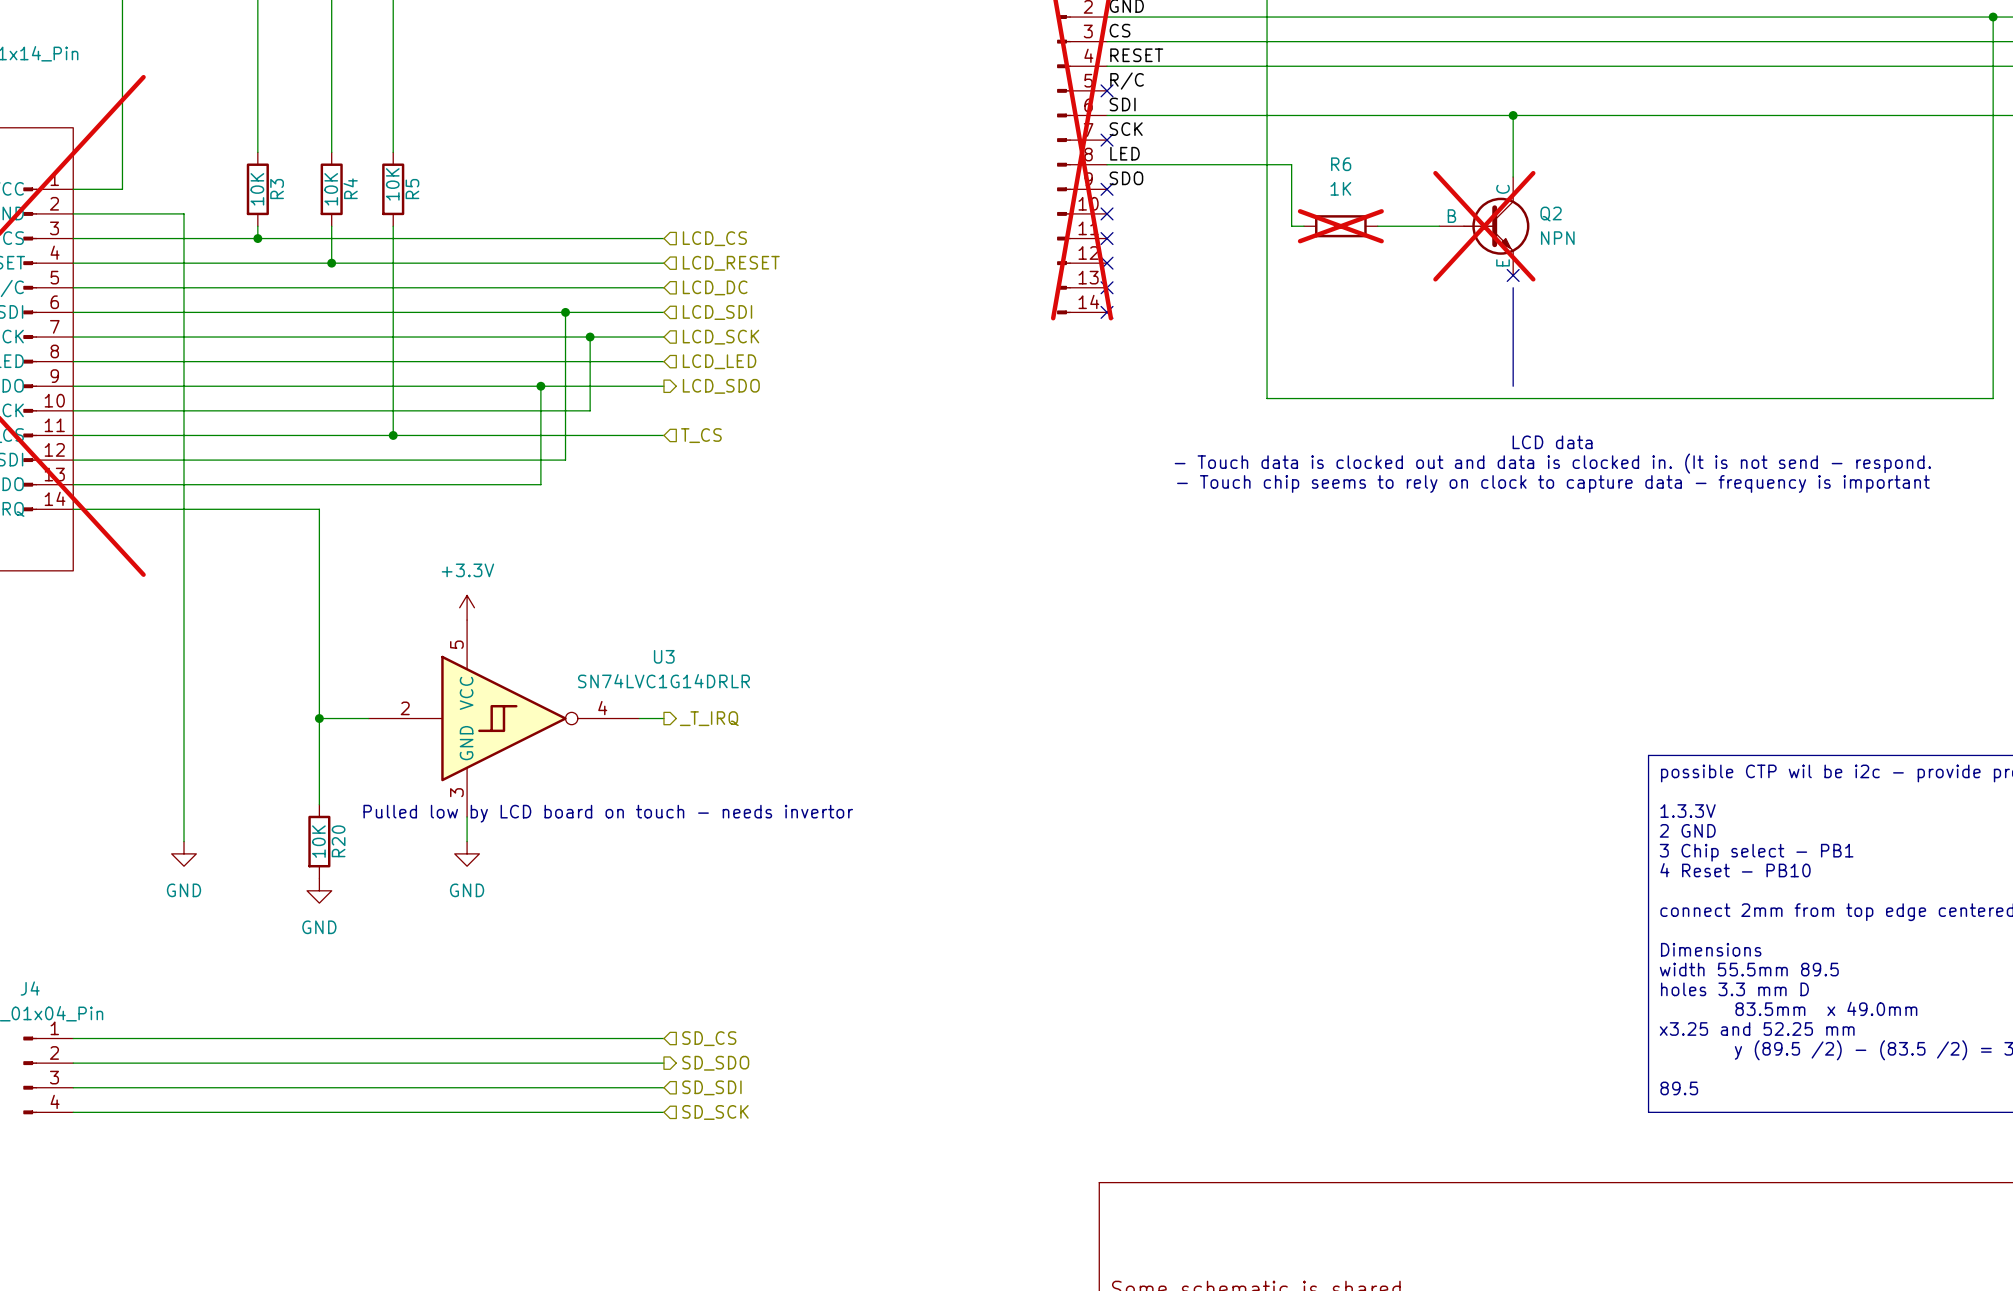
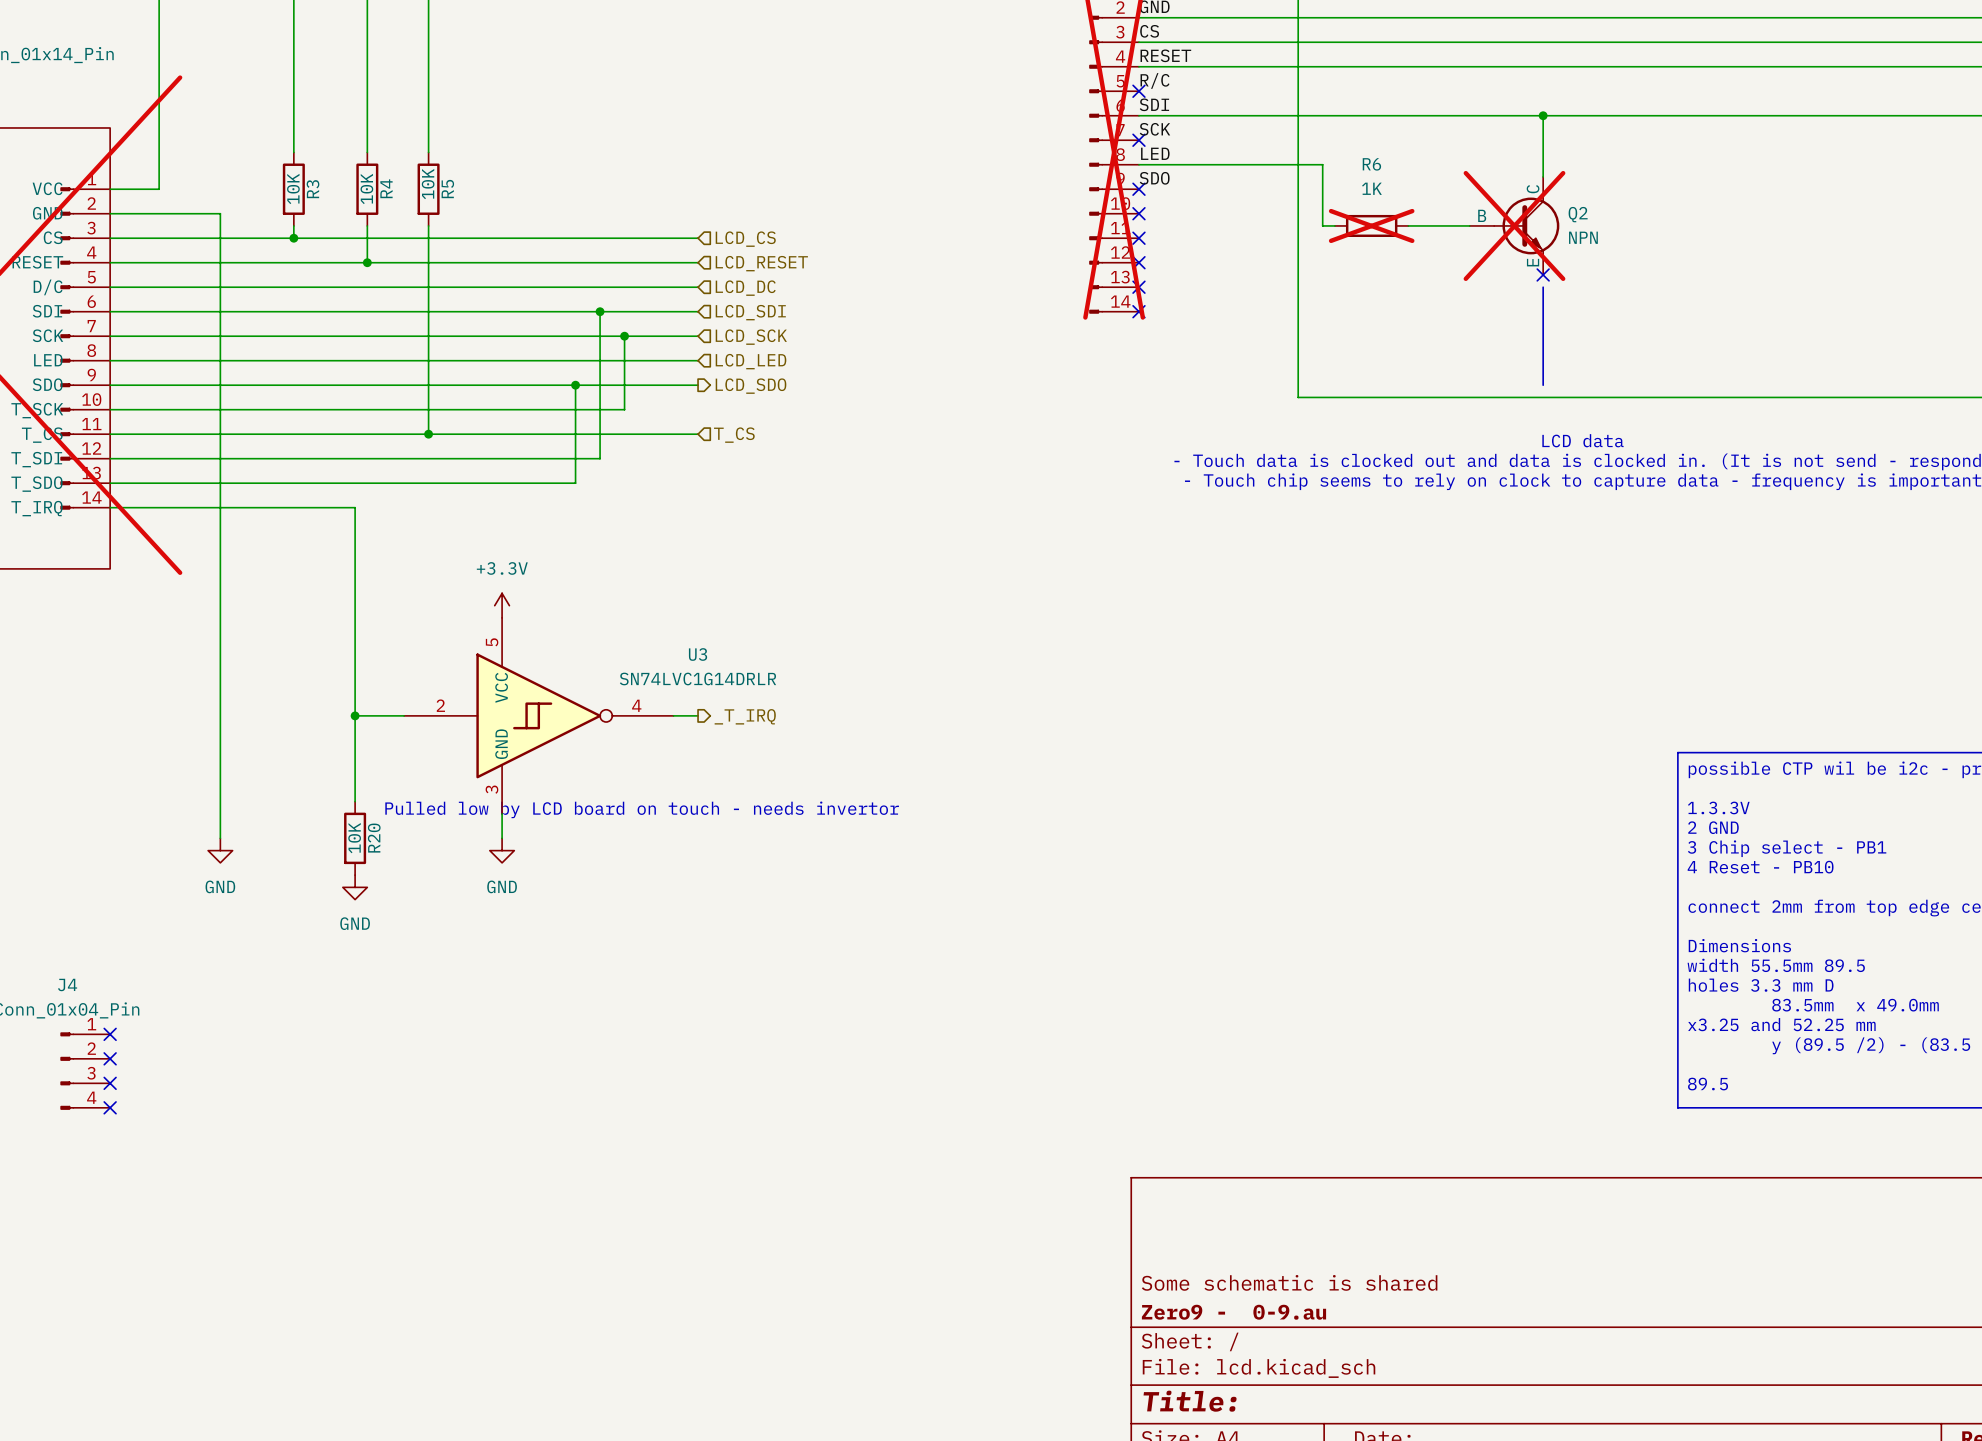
wire: (73, 1038) (663, 1038) -> none
no-connect mark: none -> (110, 1034)
hierarchical label: SD_CS (709, 1038) -> none
wire: (73, 1063) (663, 1063) -> none
no-connect mark: none -> (110, 1058)
hierarchical label: SD_SDO (715, 1063) -> none
wire: (73, 1087) (663, 1087) -> none
no-connect mark: none -> (110, 1083)
hierarchical label: SD_SDI (711, 1087) -> none
wire: (73, 1112) (663, 1112) -> none
no-connect mark: none -> (110, 1107)
hierarchical label: SD_SCK (715, 1112) -> none

